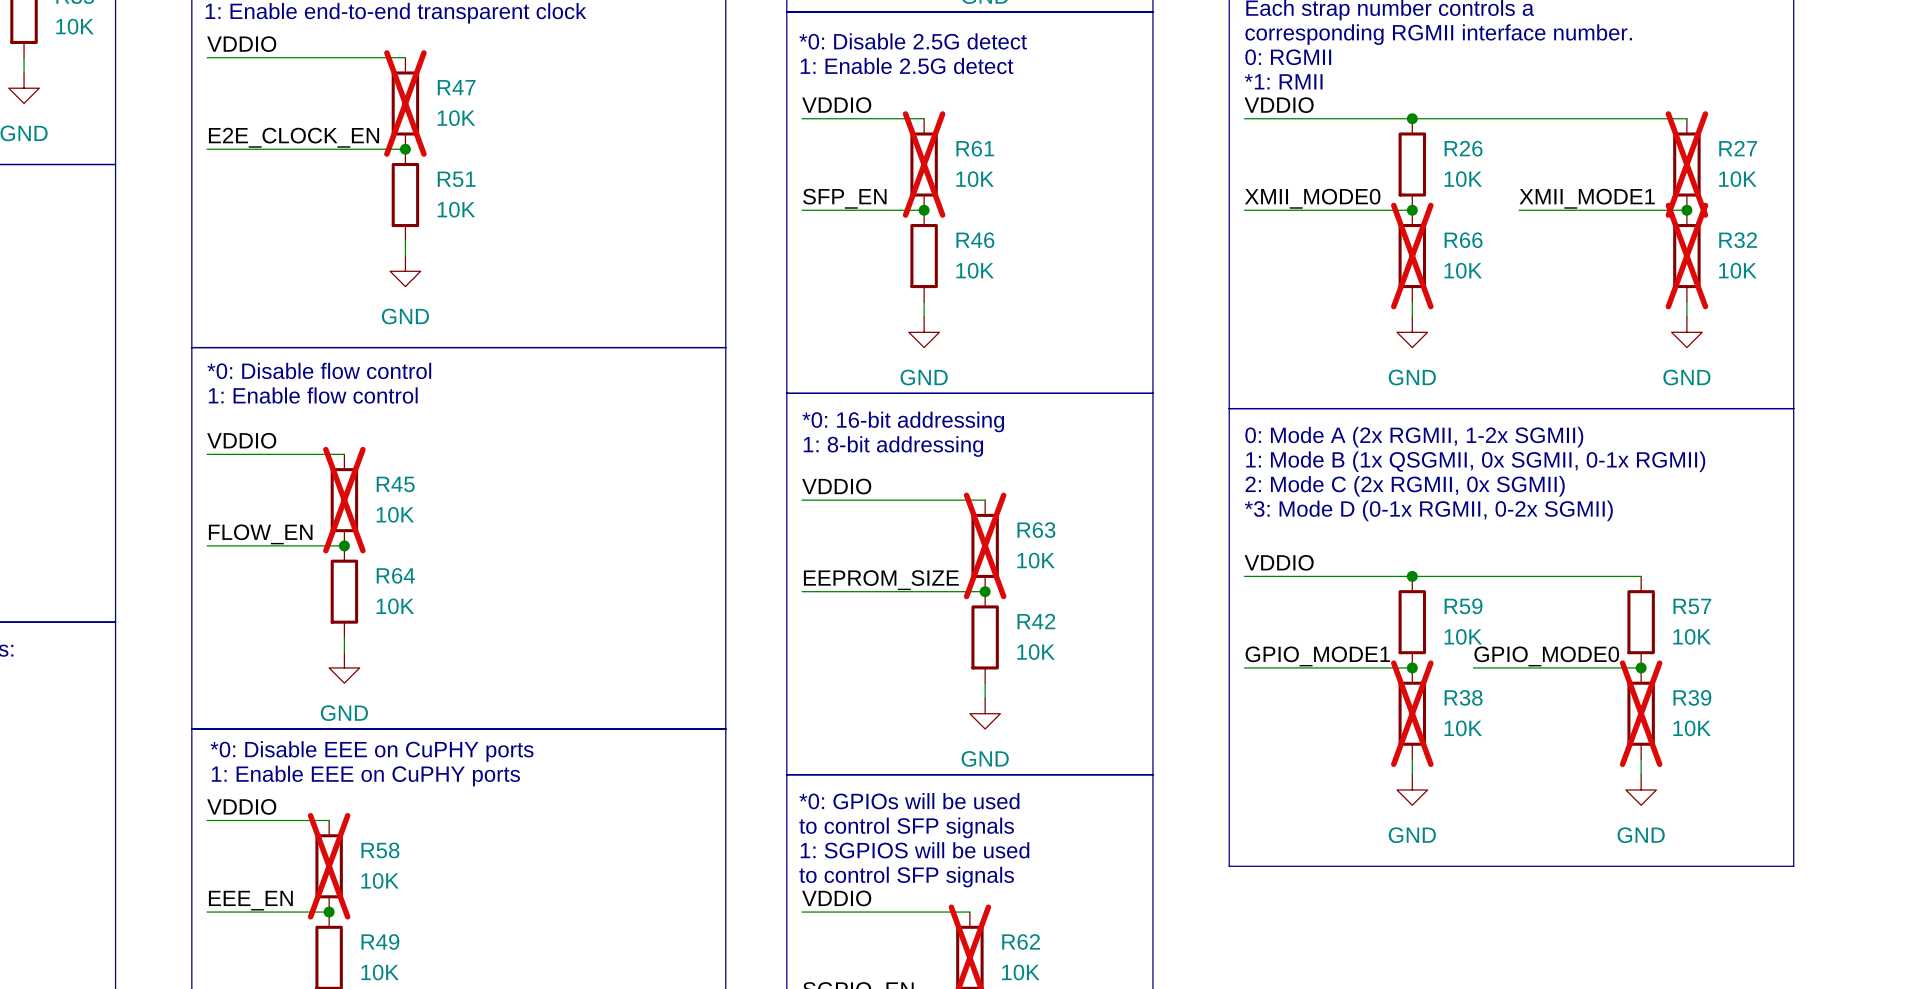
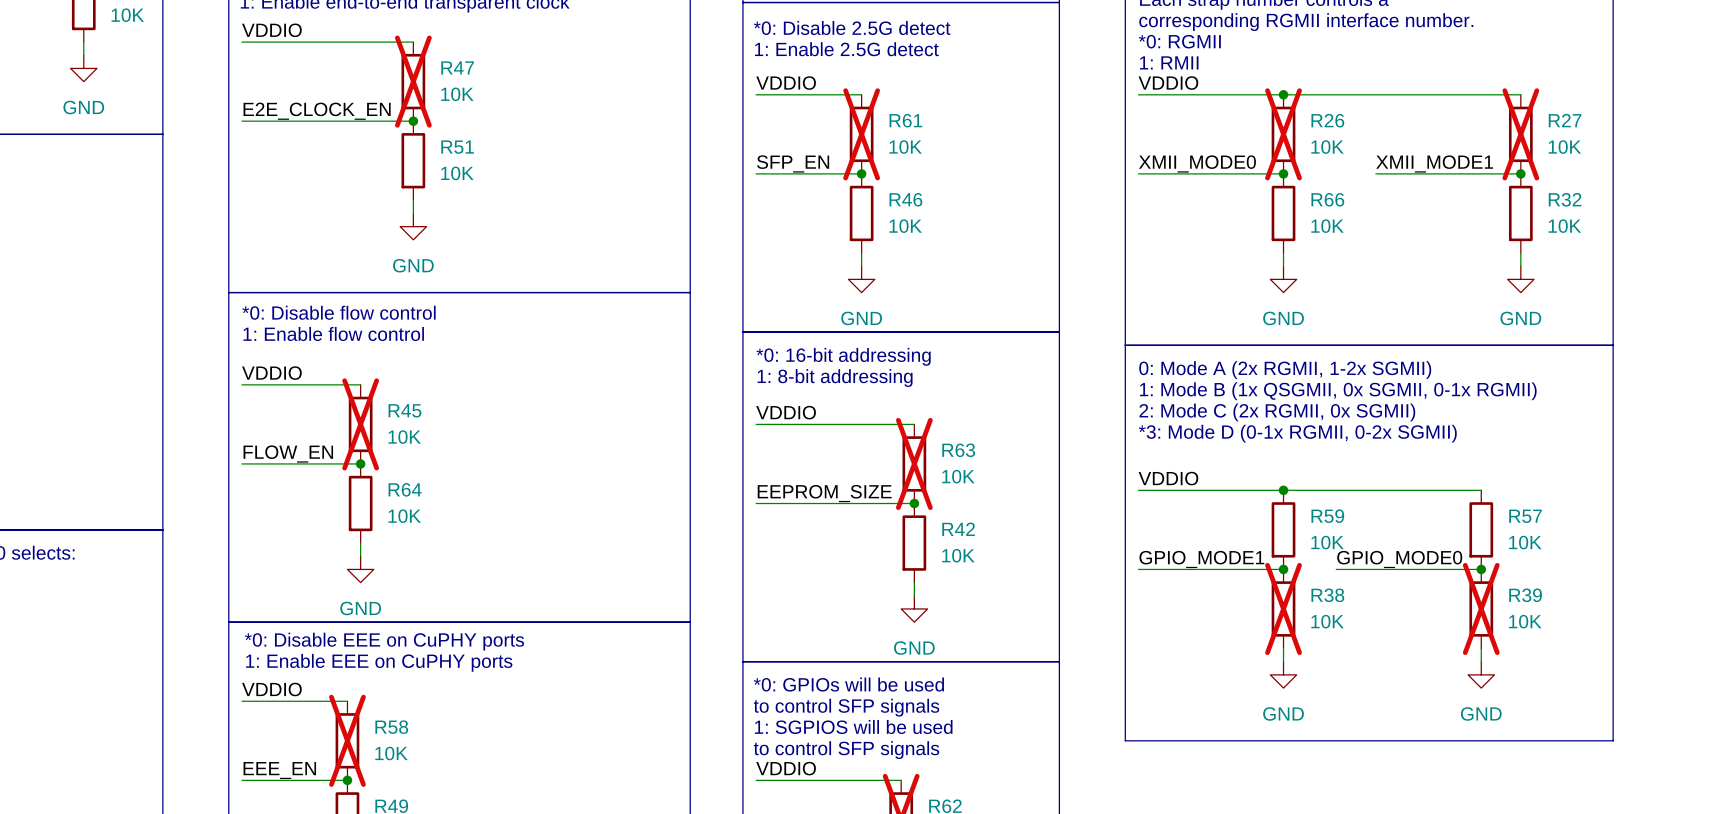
text: 0: RGMII (1288, 57) -> *0: RGMII (1179, 41)
text: *1: RMII (1283, 81) -> 1: RMII (1169, 62)
R26 do-not-place cross: none -> (1283, 134)
R66 do-not-place cross: (1412, 256) -> none
R32 do-not-place cross: (1686, 256) -> none

